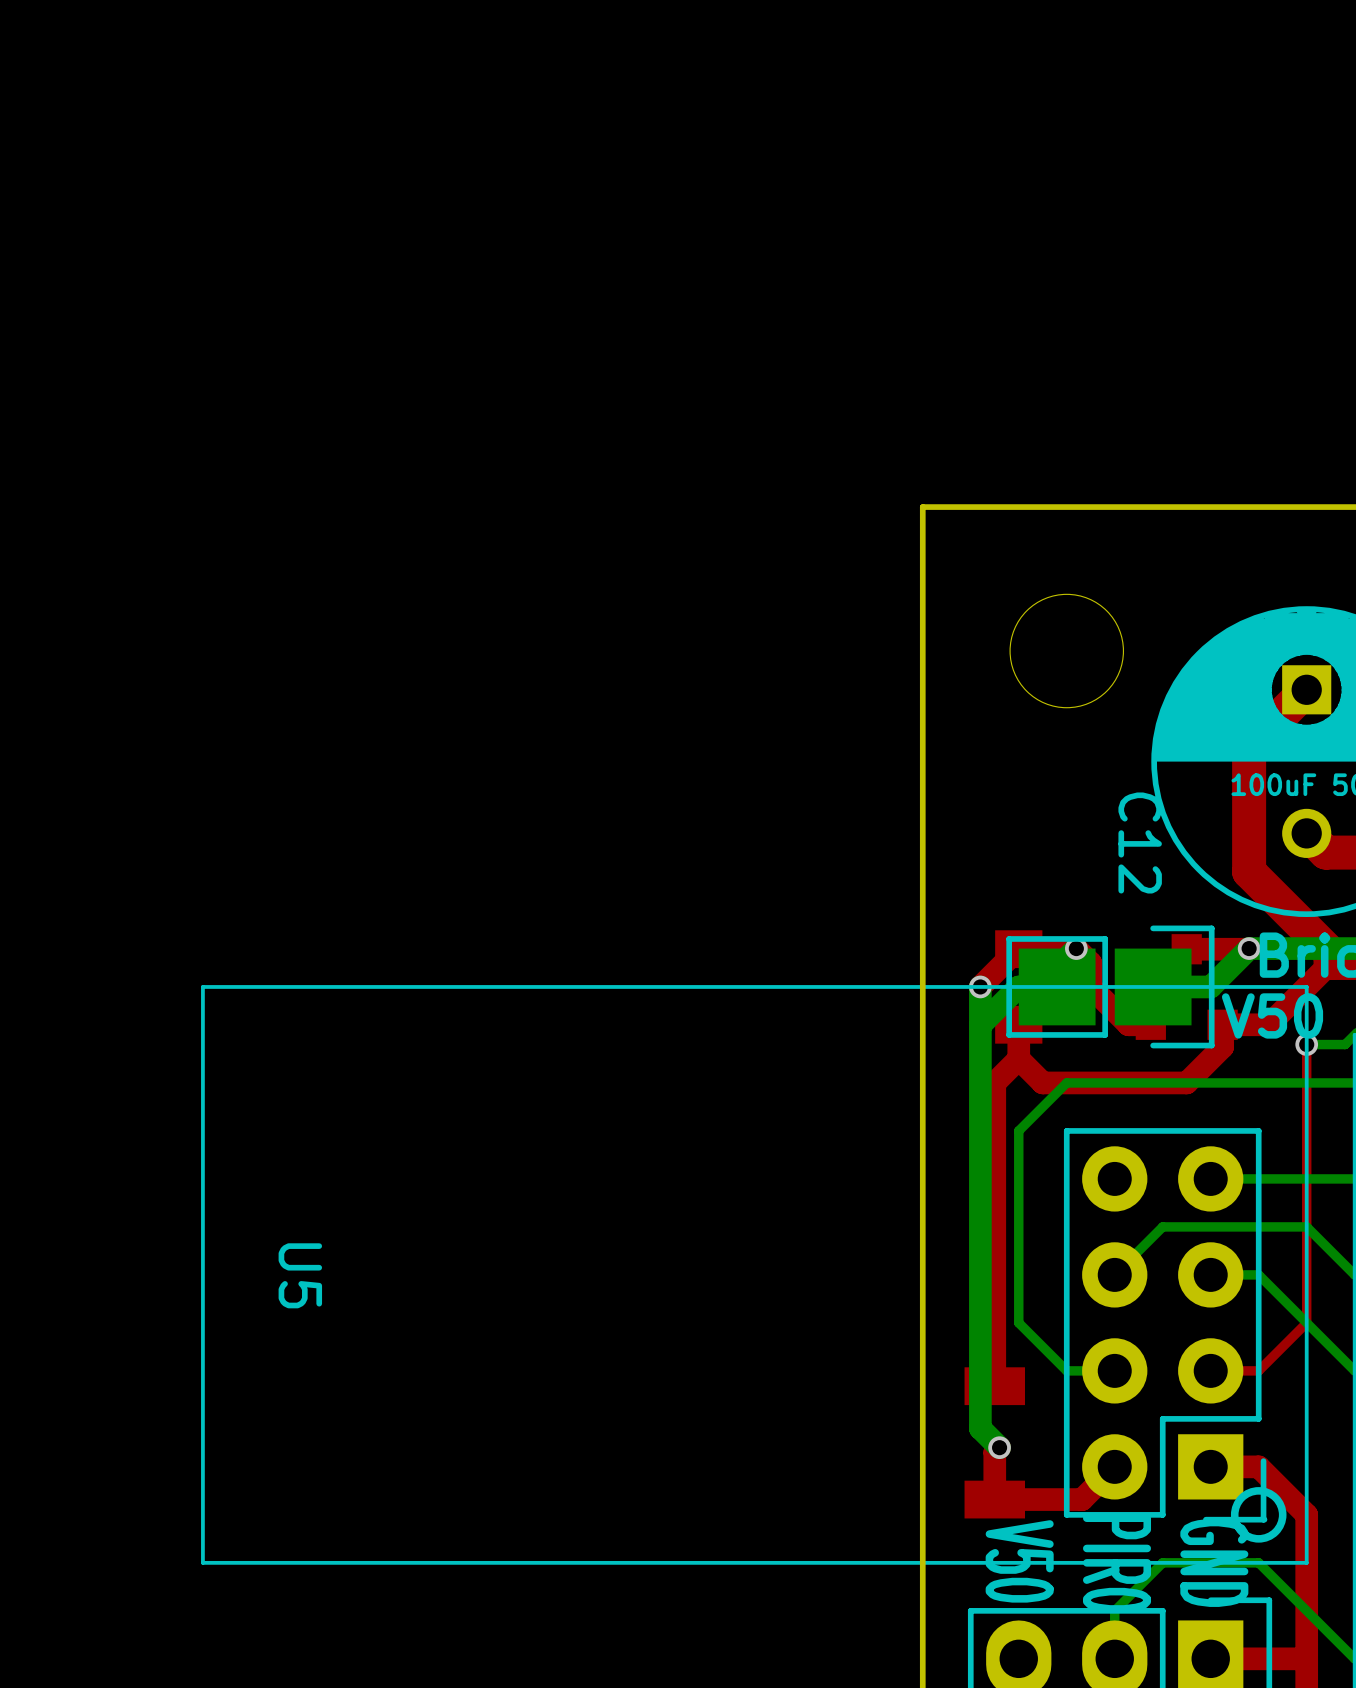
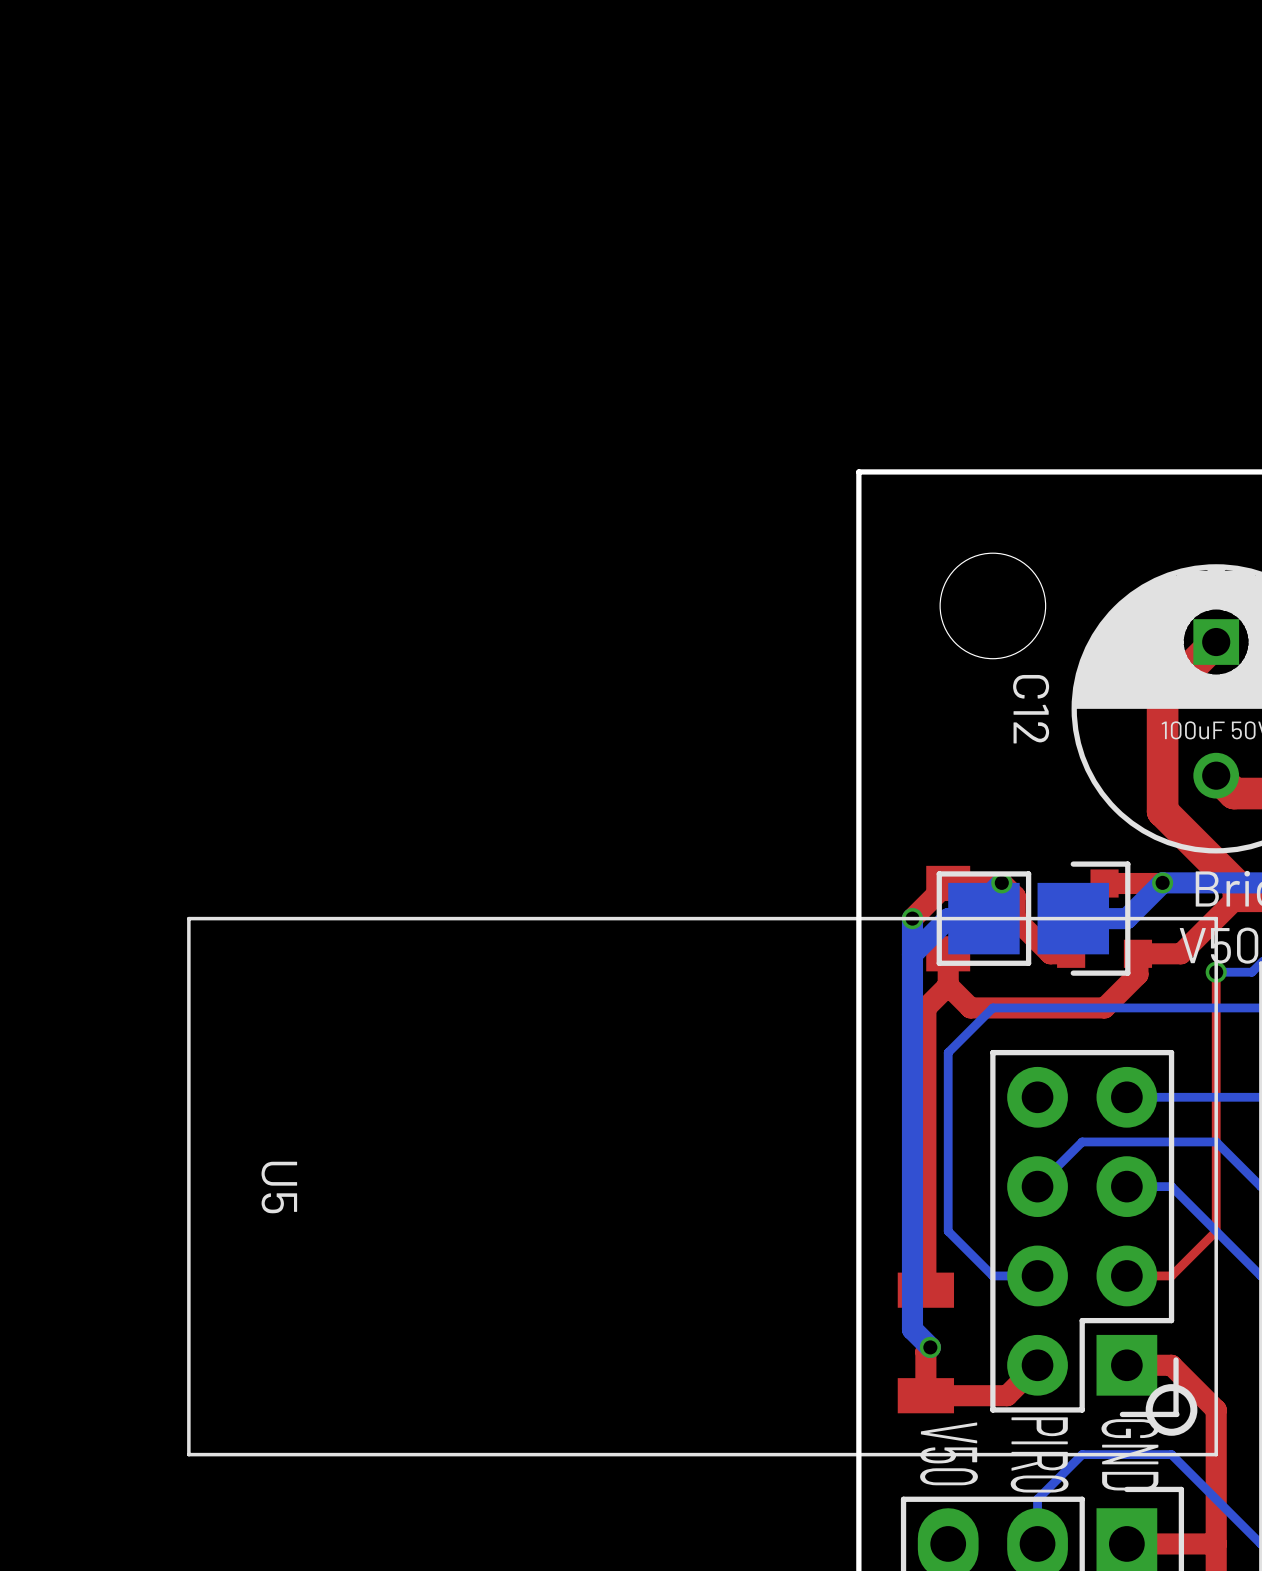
C12 name position: C12 (1140, 842) -> C12 (1031, 709)

